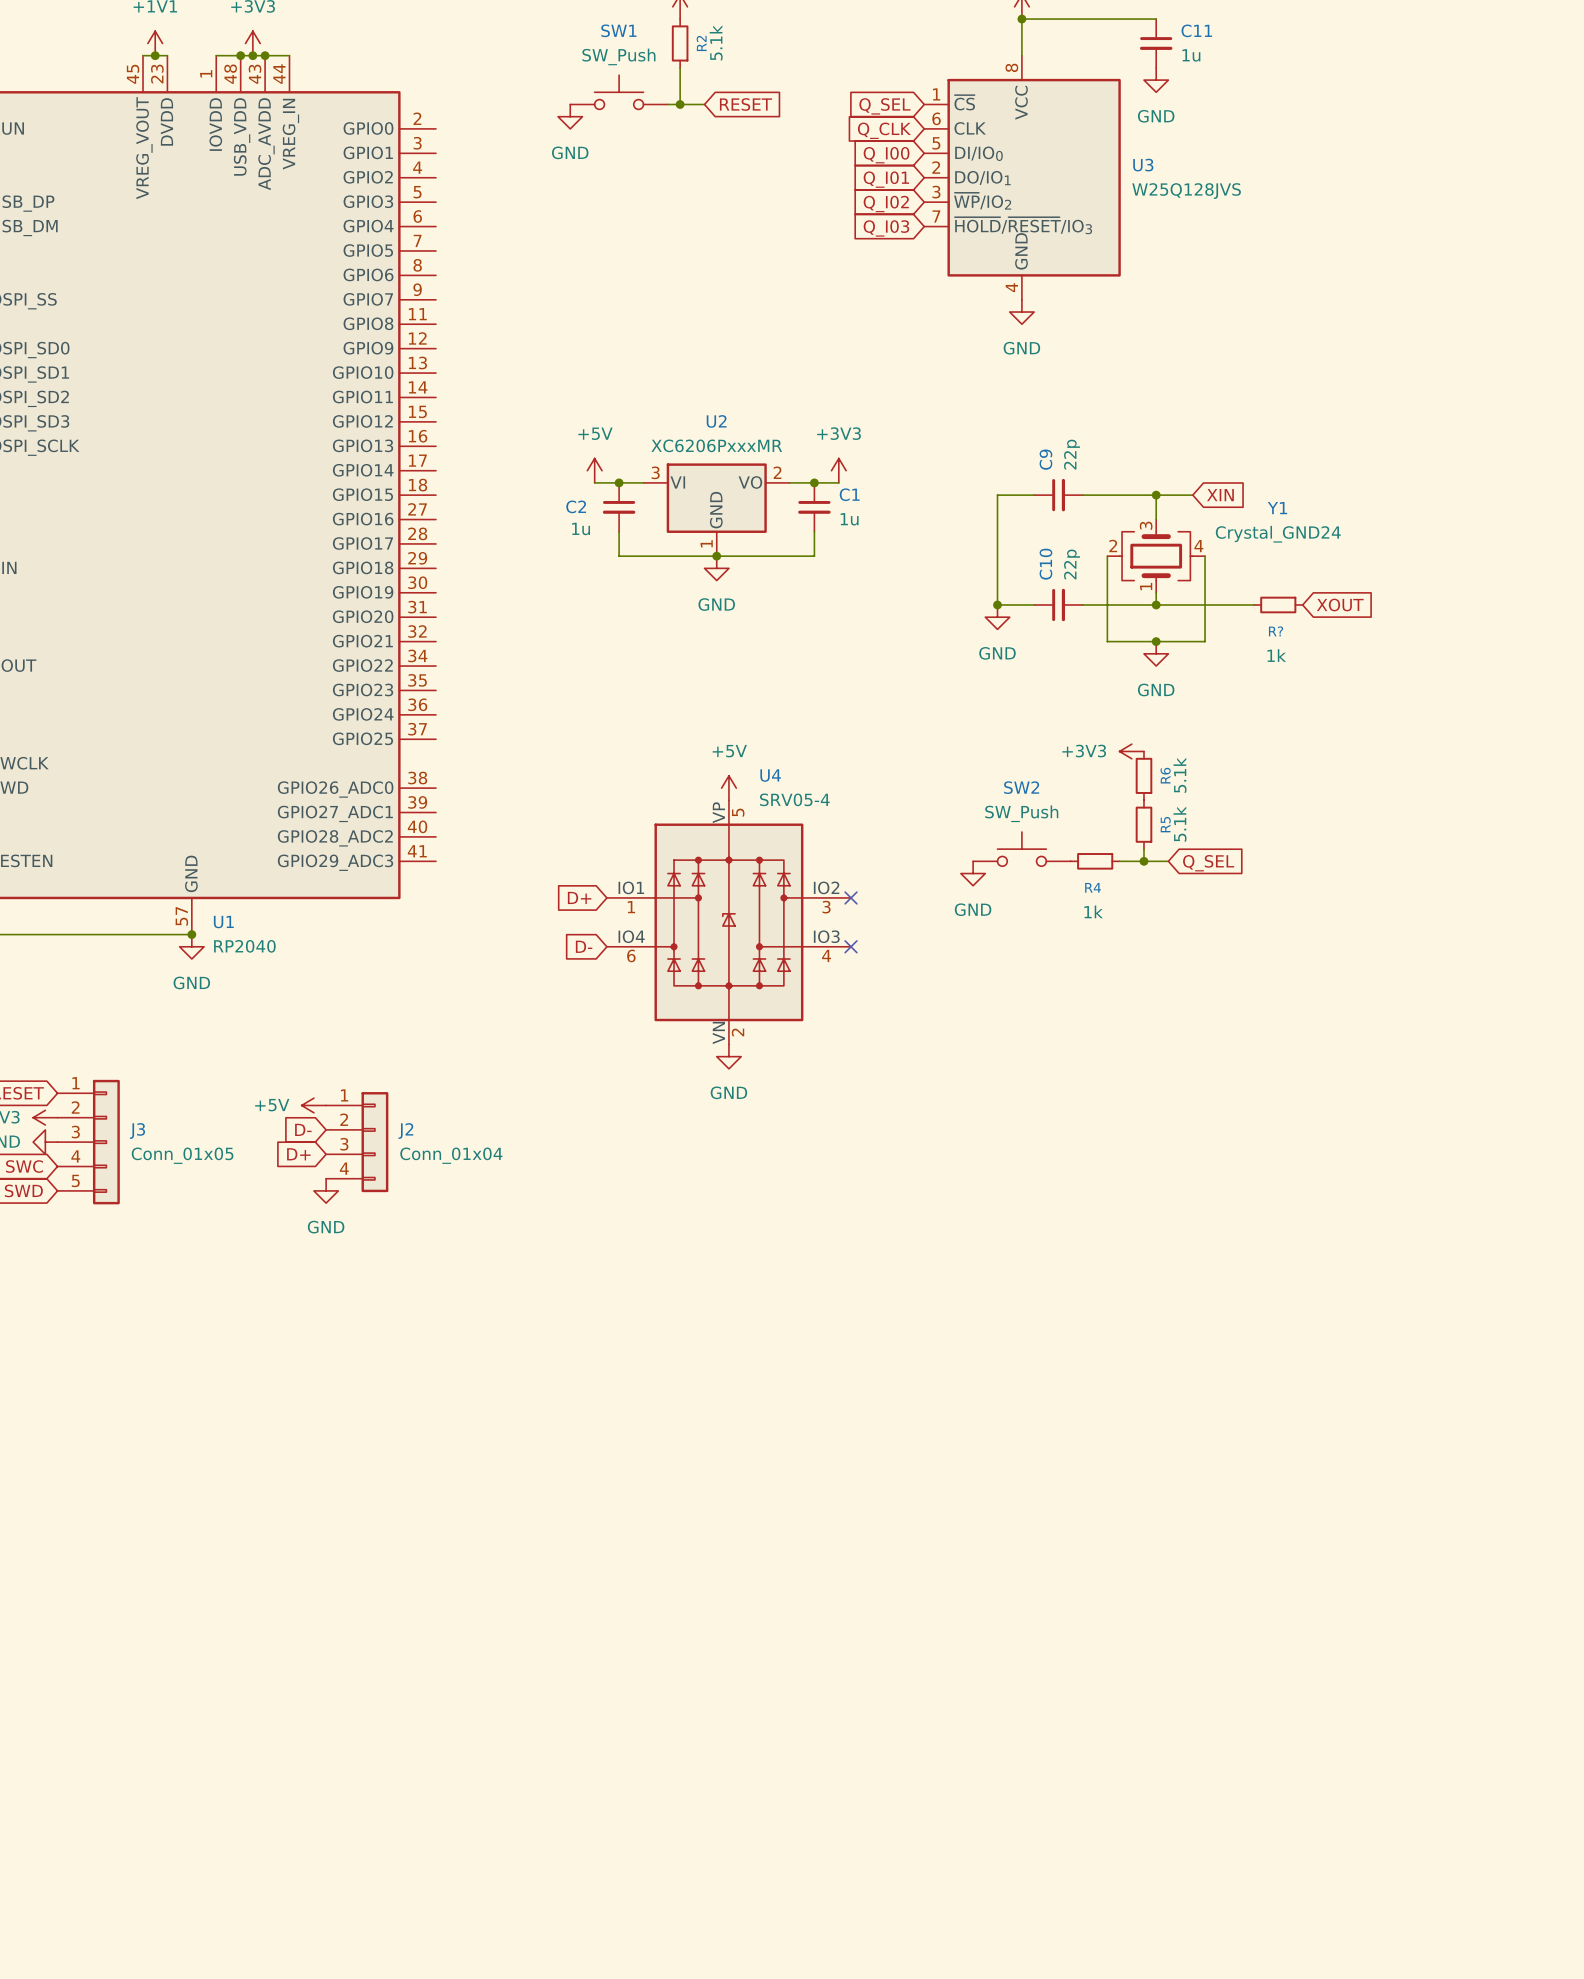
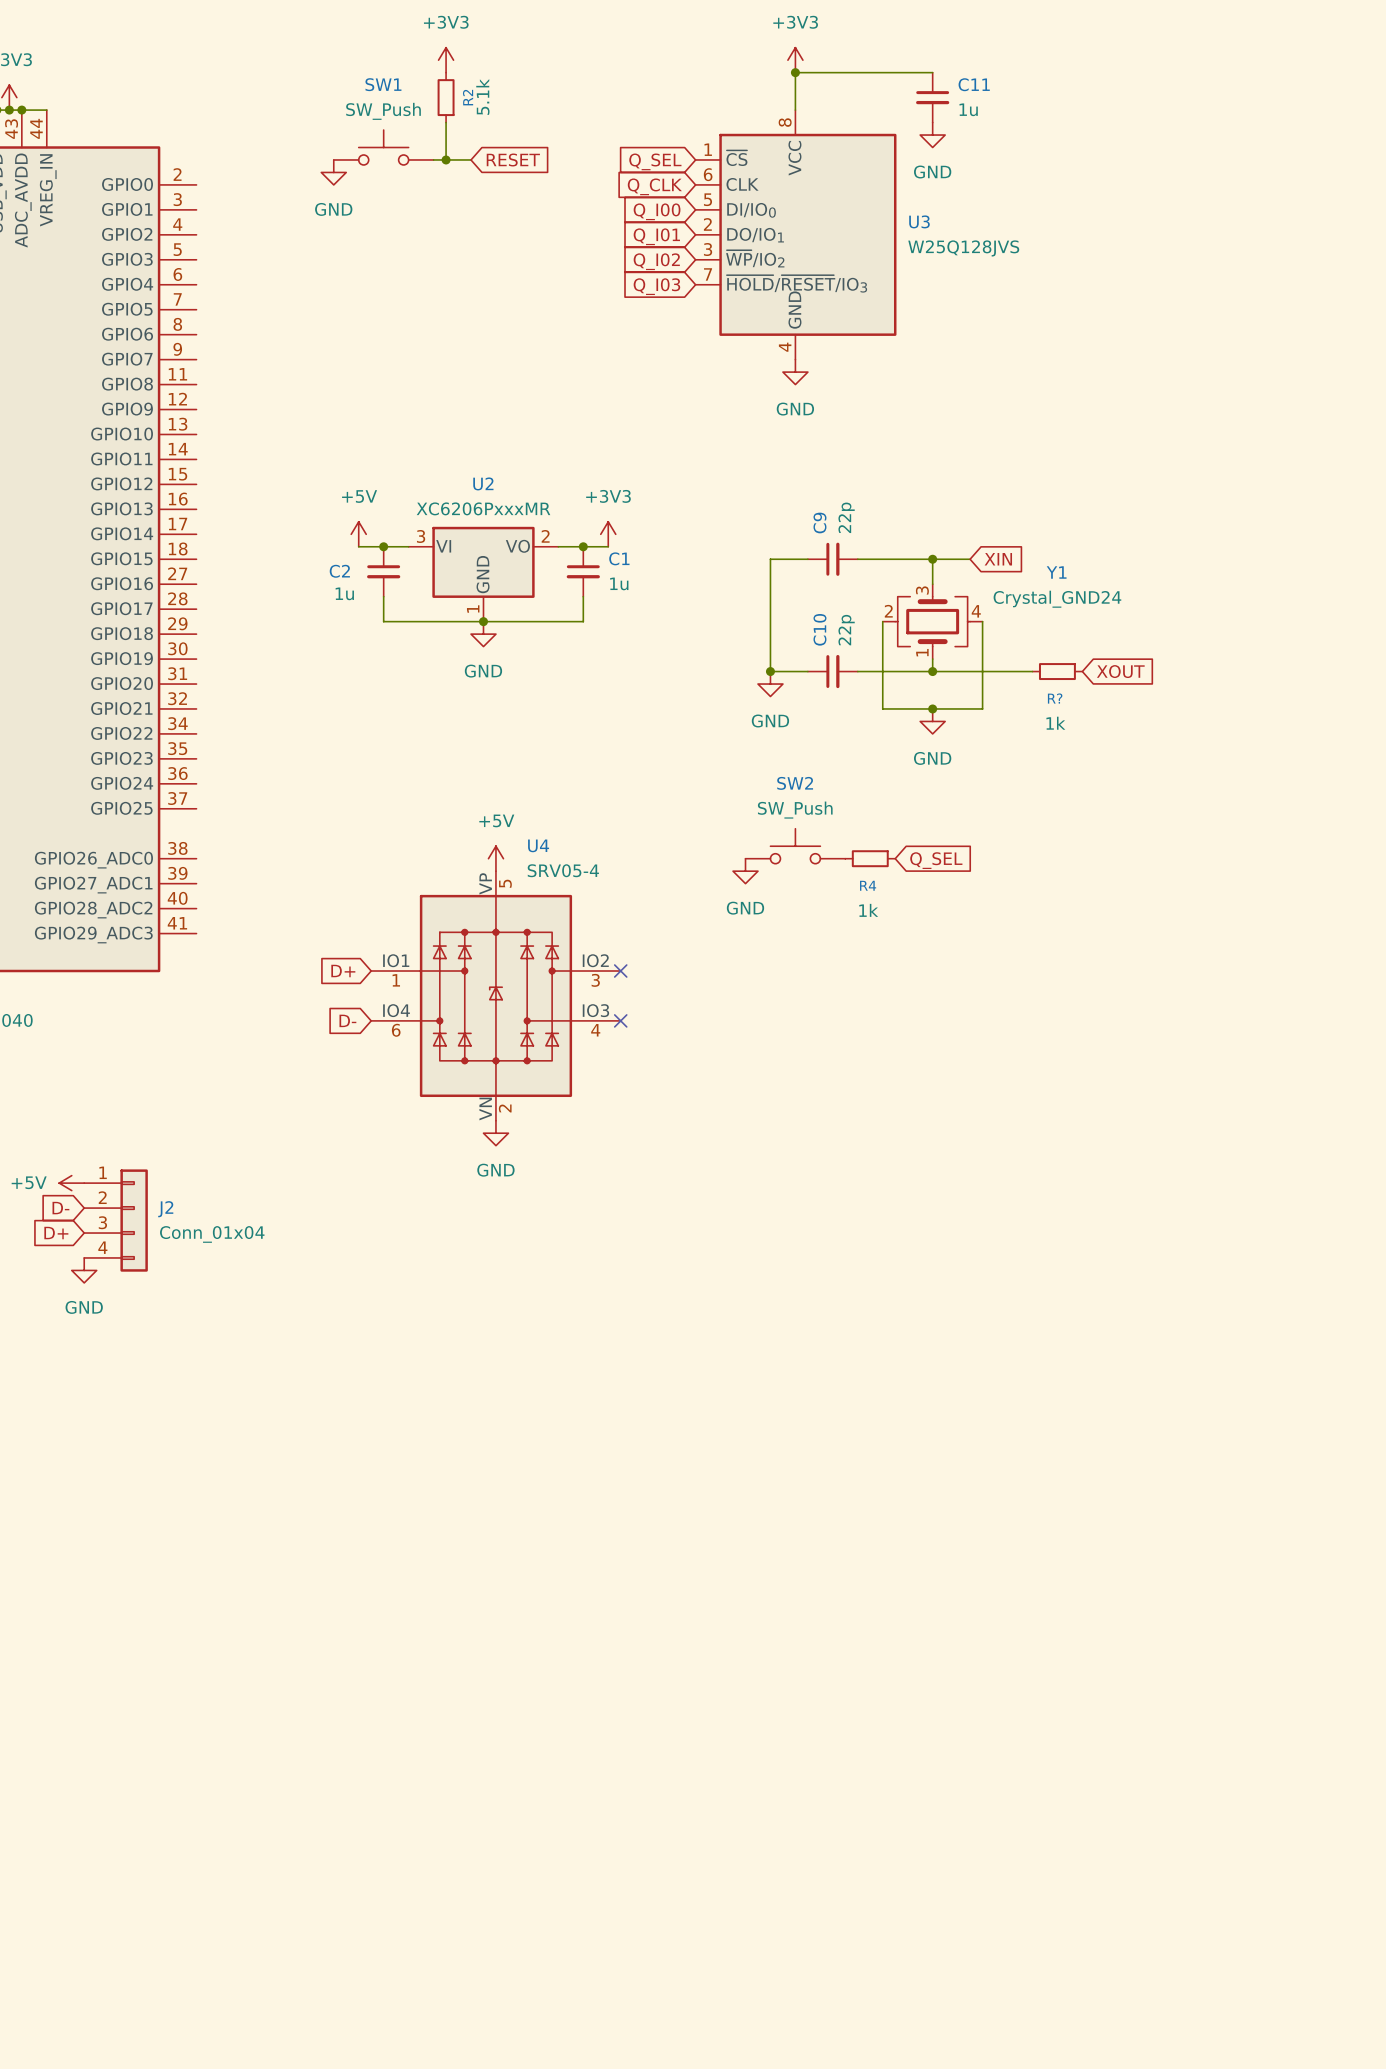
power symbol: +3V3 (1131, 751) -> none
R6: 5.1k (1143, 775) -> none
R5: 5.1k (1143, 824) -> none
SW2 position: (1021, 849) -> (795, 846)
wire: (1143, 849) (1143, 861) -> none
R4 position: (1095, 861) -> (870, 858)
wire: (1119, 861) (1168, 861) -> none
junction: (1143, 861) -> none
global label position: Q_SEL (1208, 863) -> Q_SEL (936, 860)
power symbol position: GND (973, 873) -> GND (745, 871)

